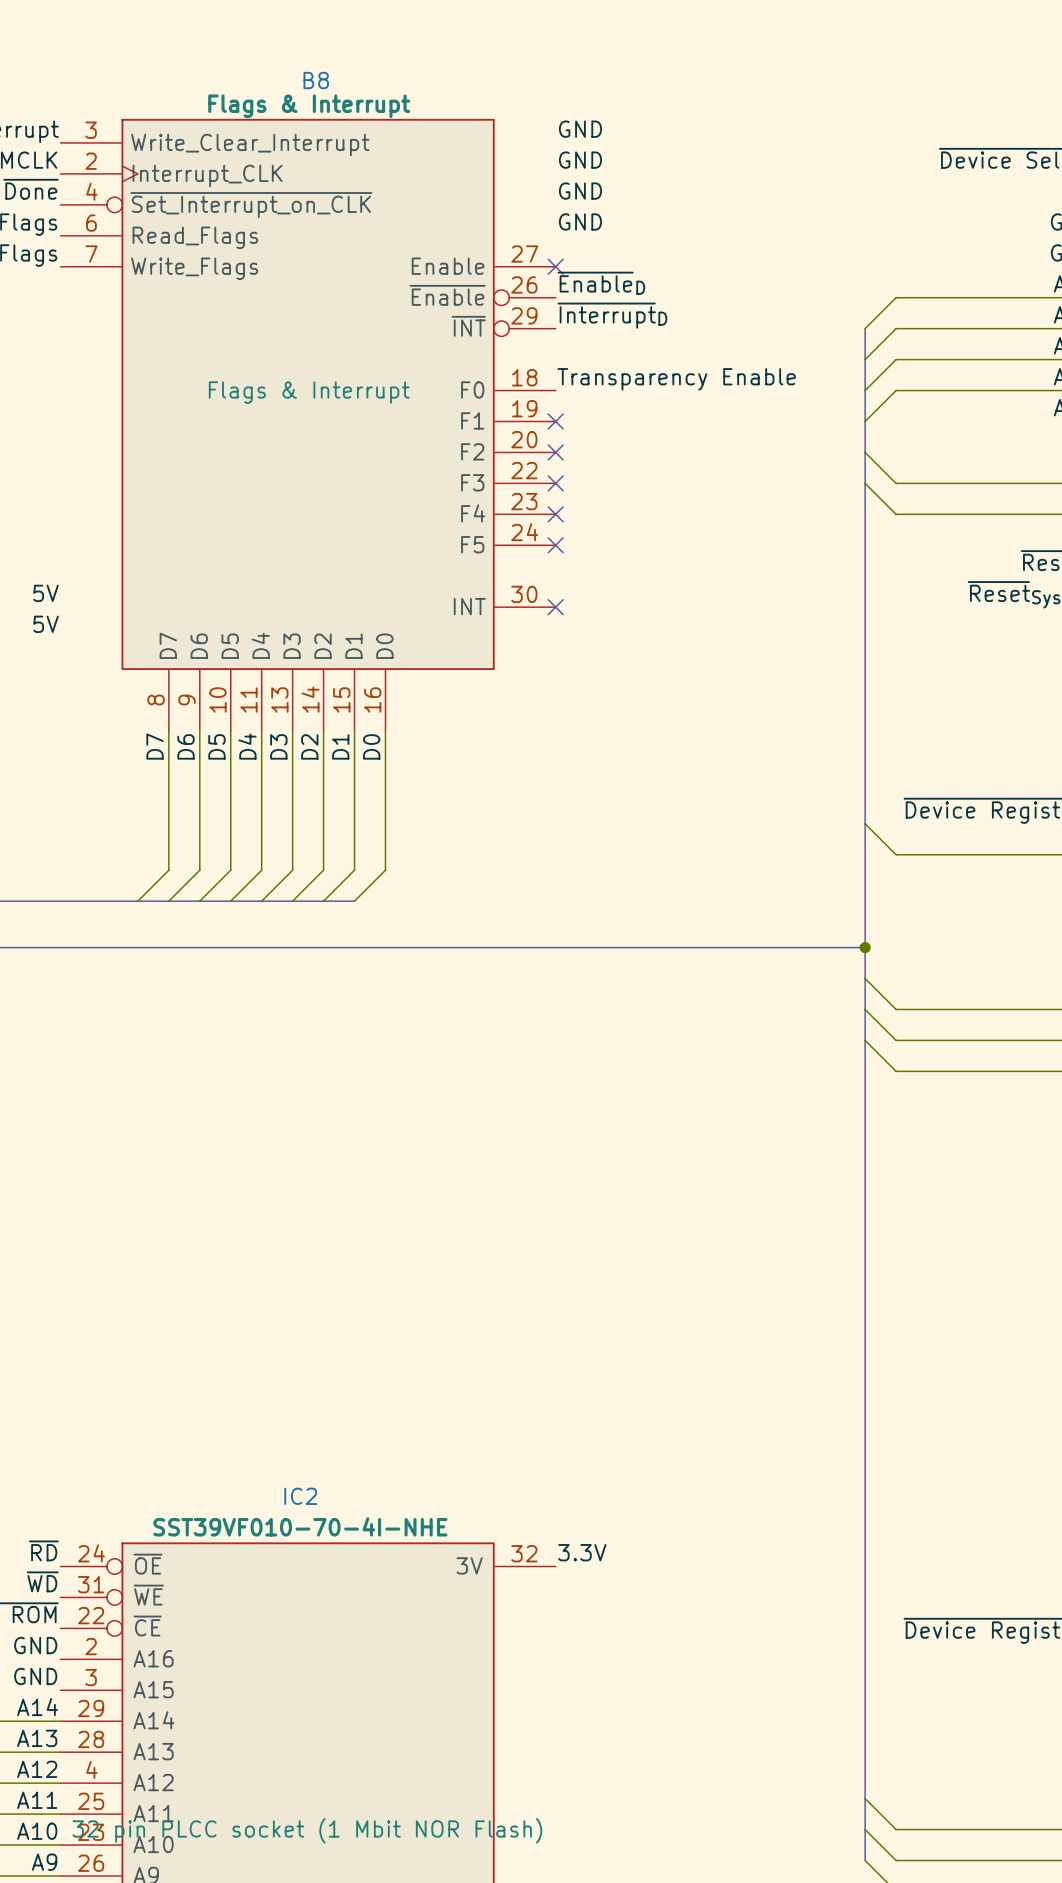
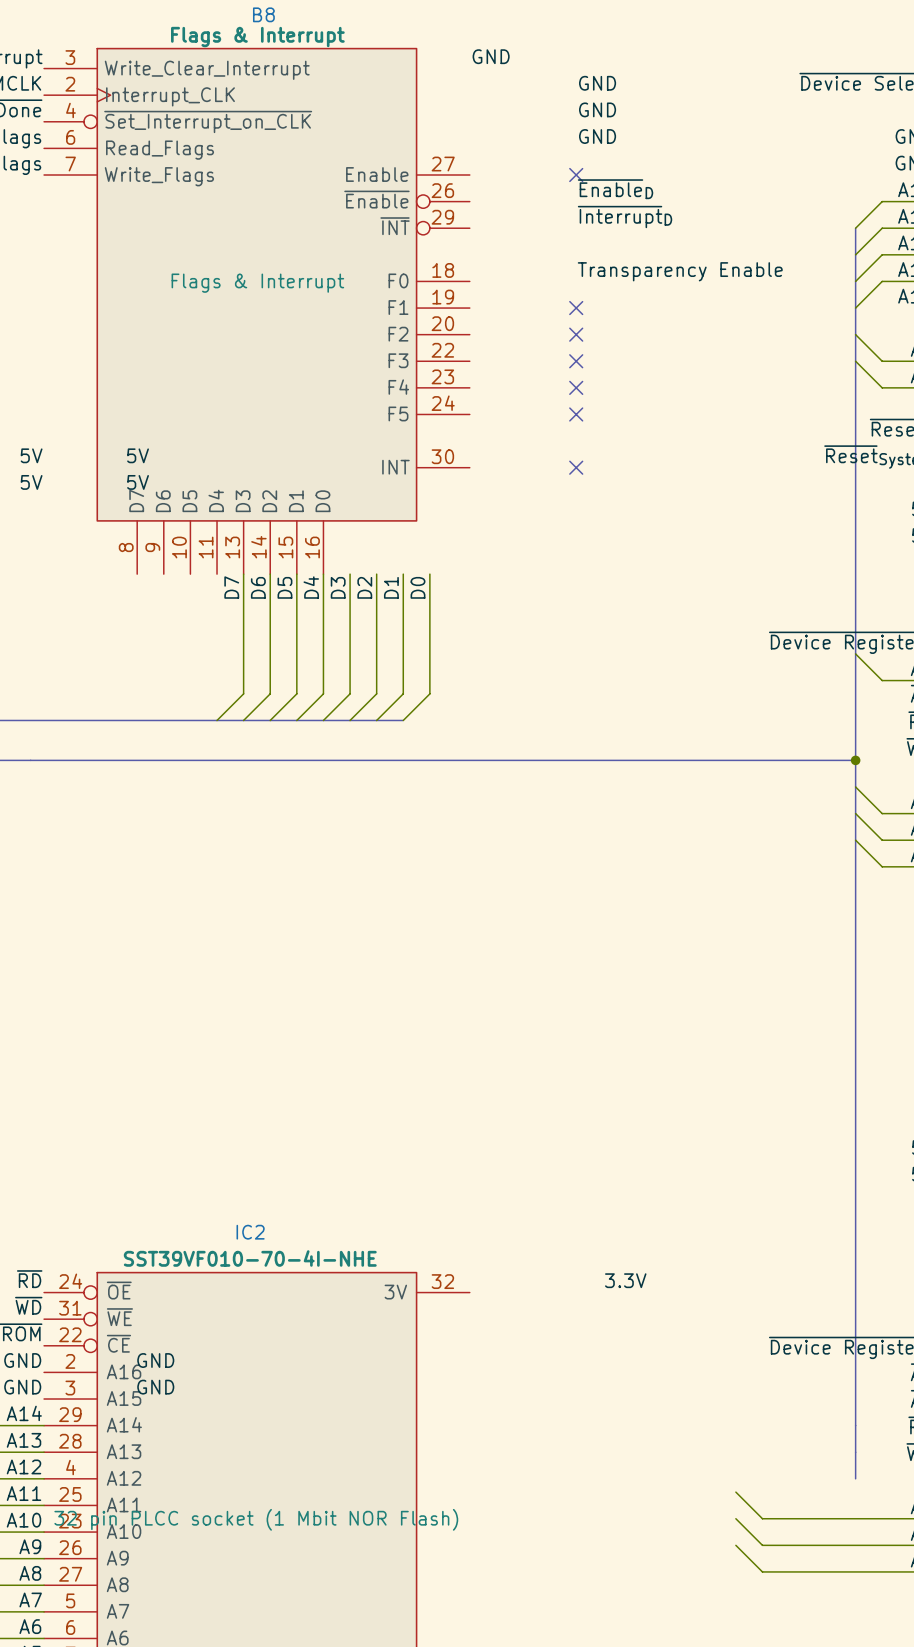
label: GND (580, 160) -> none
label: none -> GND (597, 83)
label: GND (580, 191) -> none
label: none -> GND (597, 109)
label: GND (580, 222) -> none
label: none -> GND (597, 136)
no-connect mark: (555, 266) -> none
no-connect mark: none -> (576, 175)
label position: ~{Enable}D (601, 283) -> ~{Enable}D (615, 189)
wire: (1035, 297) (896, 297) (865, 328) -> (882, 201) (855, 228)
label position: ~{Interrupt}D (612, 315) -> ~{Interrupt}D (625, 217)
bus: (865, 328) (865, 1860) -> none
bus: none -> (855, 228) (855, 1478)
wire: (1035, 328) (896, 328) (865, 359) -> (882, 228) (855, 254)
wire: (1035, 359) (896, 359) (865, 390) -> (882, 254) (855, 281)
label position: Transparency Enable (676, 379) -> Transparency Enable (680, 271)
wire: (1035, 390) (896, 390) (865, 421) -> (882, 281) (855, 308)
no-connect mark: (555, 421) -> none
no-connect mark: none -> (576, 308)
no-connect mark: (555, 452) -> none
no-connect mark: none -> (576, 334)
wire: (865, 452) (896, 483) (1035, 483) -> (855, 334) (882, 361)
no-connect mark: (555, 483) -> none
no-connect mark: none -> (576, 361)
wire: (865, 483) (896, 514) (1035, 514) -> (855, 361) (882, 387)
no-connect mark: (555, 514) -> none
no-connect mark: none -> (576, 387)
no-connect mark: (555, 545) -> none
no-connect mark: none -> (576, 414)
label: none -> 5V (138, 455)
no-connect mark: (555, 607) -> none
no-connect mark: none -> (576, 467)
label: none -> 5V (138, 482)
wire: (168, 730) (168, 870) (137, 901) -> none
wire: (199, 730) (199, 870) (168, 901) -> (376, 574) (376, 693) (350, 720)
wire: (230, 730) (230, 870) (199, 901) -> (403, 574) (403, 693) (376, 720)
wire: (261, 730) (261, 870) (230, 901) -> (350, 574) (350, 693) (323, 720)
wire: none -> (429, 574) (429, 693) (403, 720)
label: D7 (155, 746) -> none
label: D6 (185, 746) -> none
label: D5 (216, 746) -> none
label: D4 (247, 746) -> none
label: D3 (278, 746) -> D7 (231, 587)
label: D2 (309, 746) -> D6 (258, 587)
label: D1 (340, 746) -> D5 (284, 587)
label: D0 (371, 746) -> D4 (311, 587)
label: none -> D3 (338, 587)
label: none -> D2 (364, 587)
label: none -> D1 (391, 587)
label: none -> D0 (418, 587)
wire: (865, 823) (896, 854) (1035, 854) -> (855, 653) (882, 680)
bus: none -> (296, 720) (403, 720)
bus: none -> (735, 760) (855, 760)
junction: (865, 947) -> none
junction: none -> (855, 760)
wire: (865, 978) (896, 1009) (1035, 1009) -> (855, 787) (882, 813)
wire: (865, 1009) (896, 1040) (1035, 1040) -> (855, 813) (882, 840)
wire: (865, 1040) (896, 1071) (1035, 1071) -> (855, 840) (882, 866)
label position: 3.3V (582, 1552) -> 3.3V (625, 1280)
label: none -> GND (155, 1360)
label: none -> GND (155, 1387)

